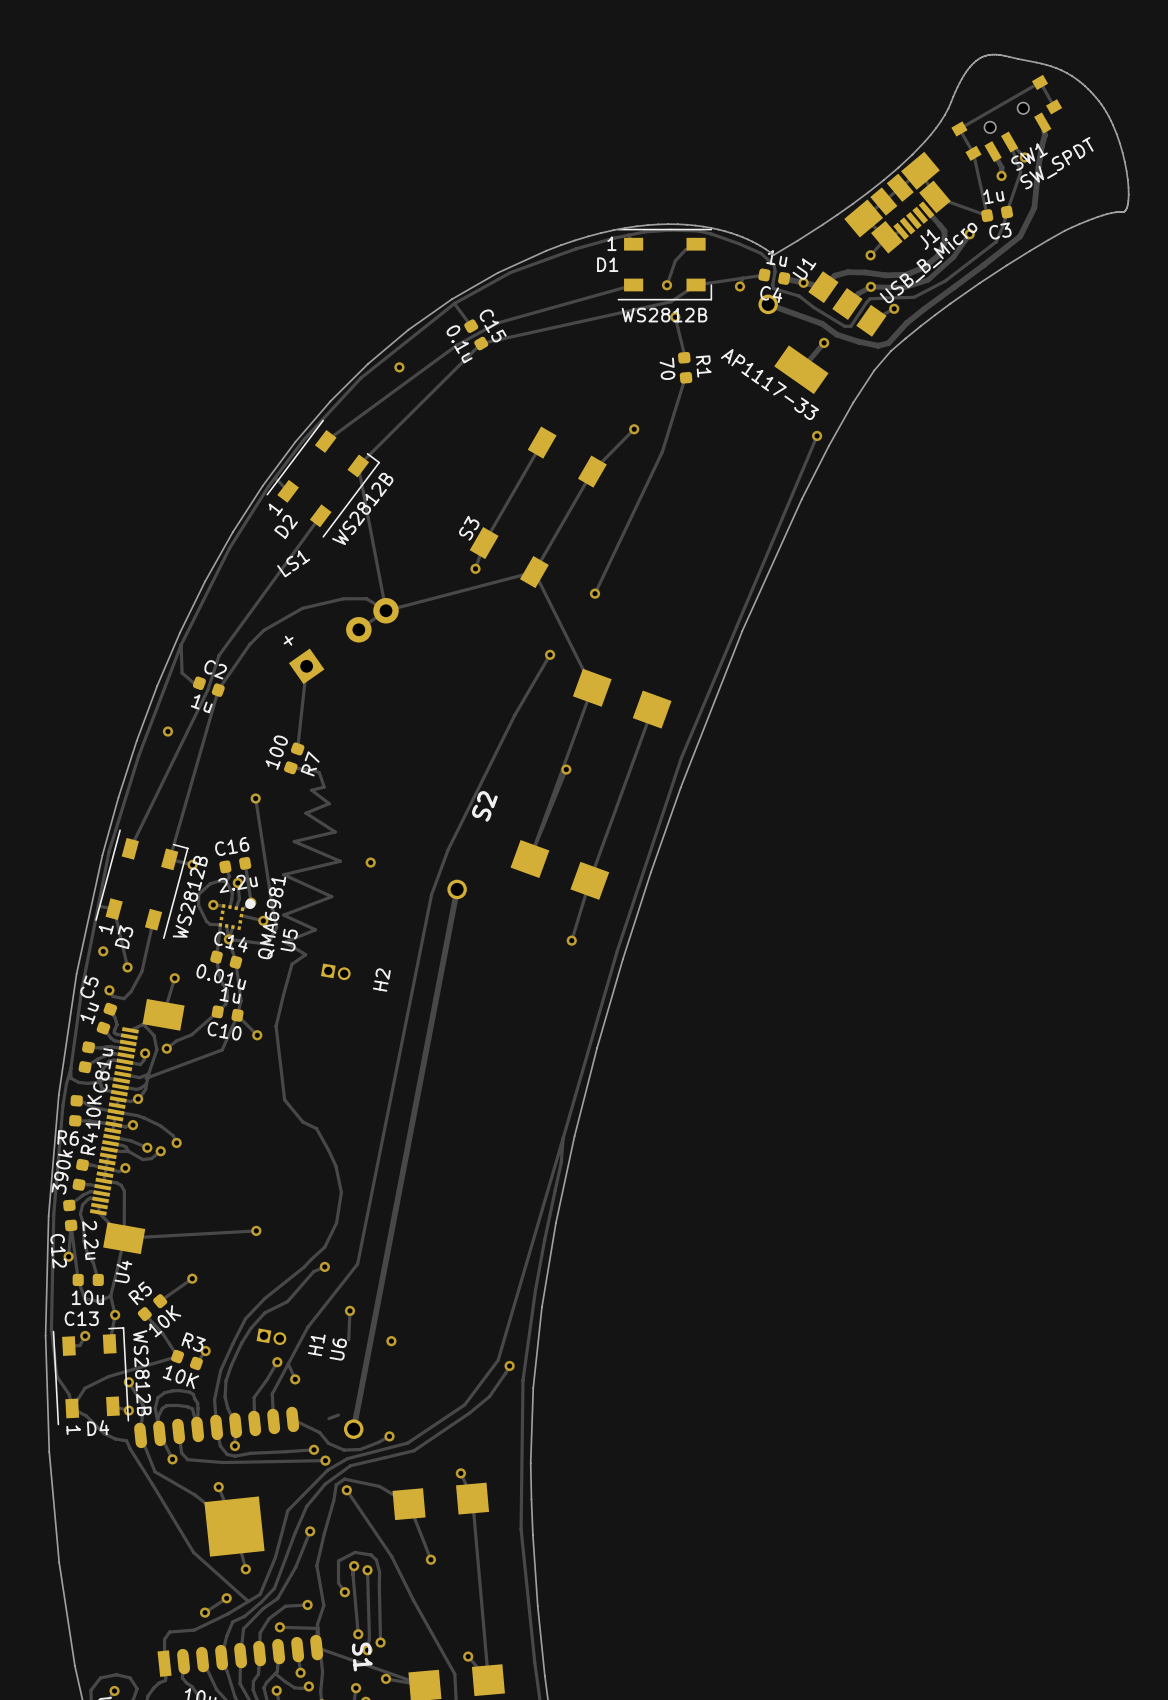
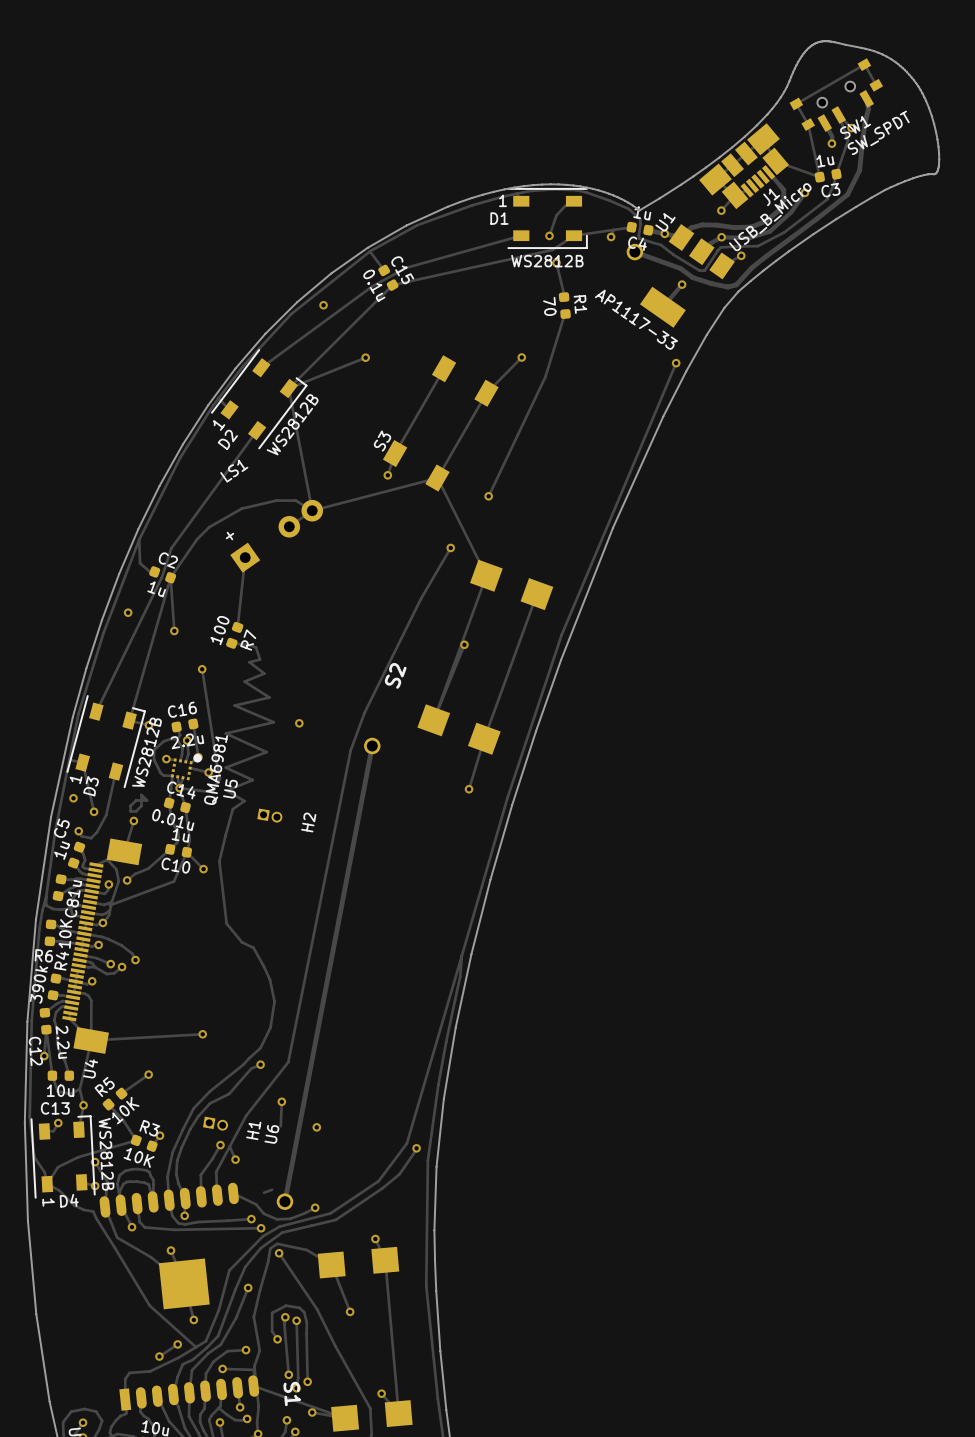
track: none -> (365, 357) (288, 388)
via: none -> (365, 357)
track: none -> (170, 577) (174, 631)
via: none -> (174, 631)
track: none -> (141, 794) (147, 800) (136, 800) (130, 805) (130, 811) (136, 811) (141, 805) (141, 794)

